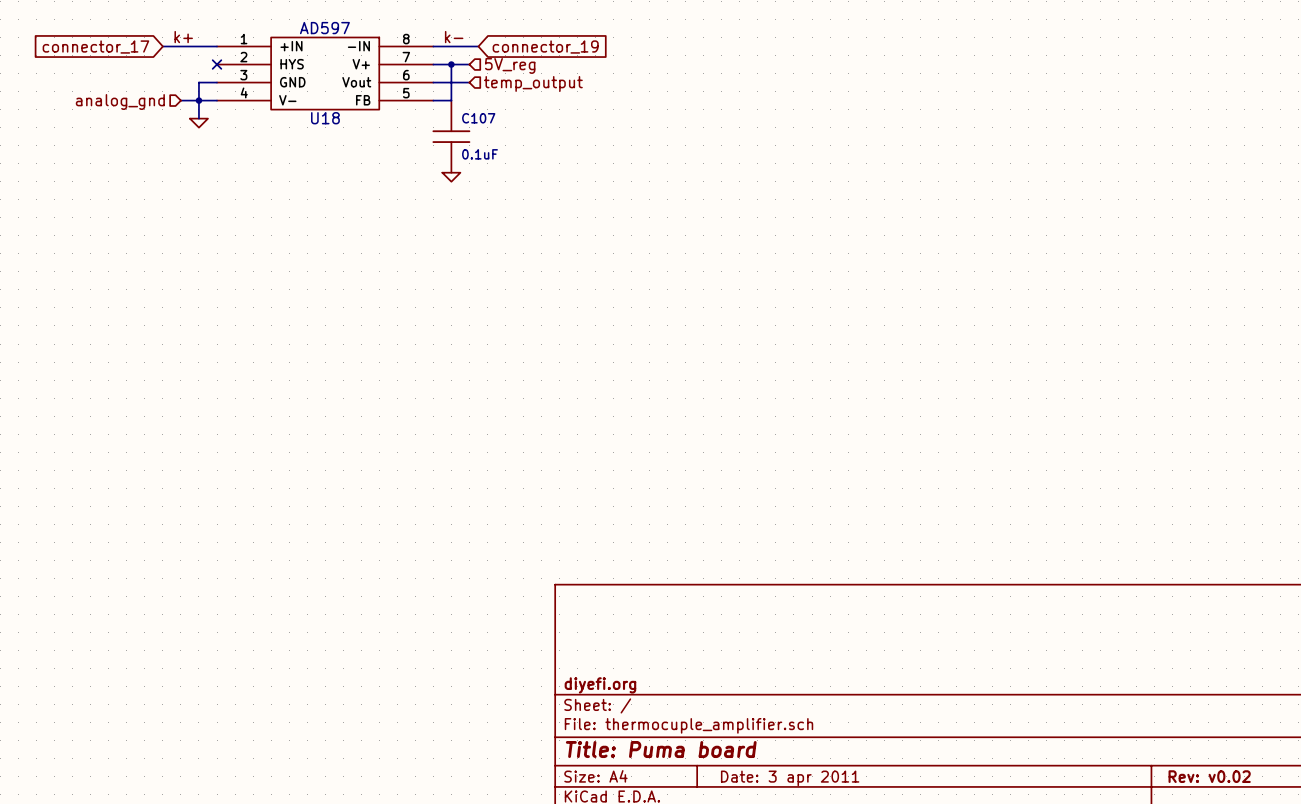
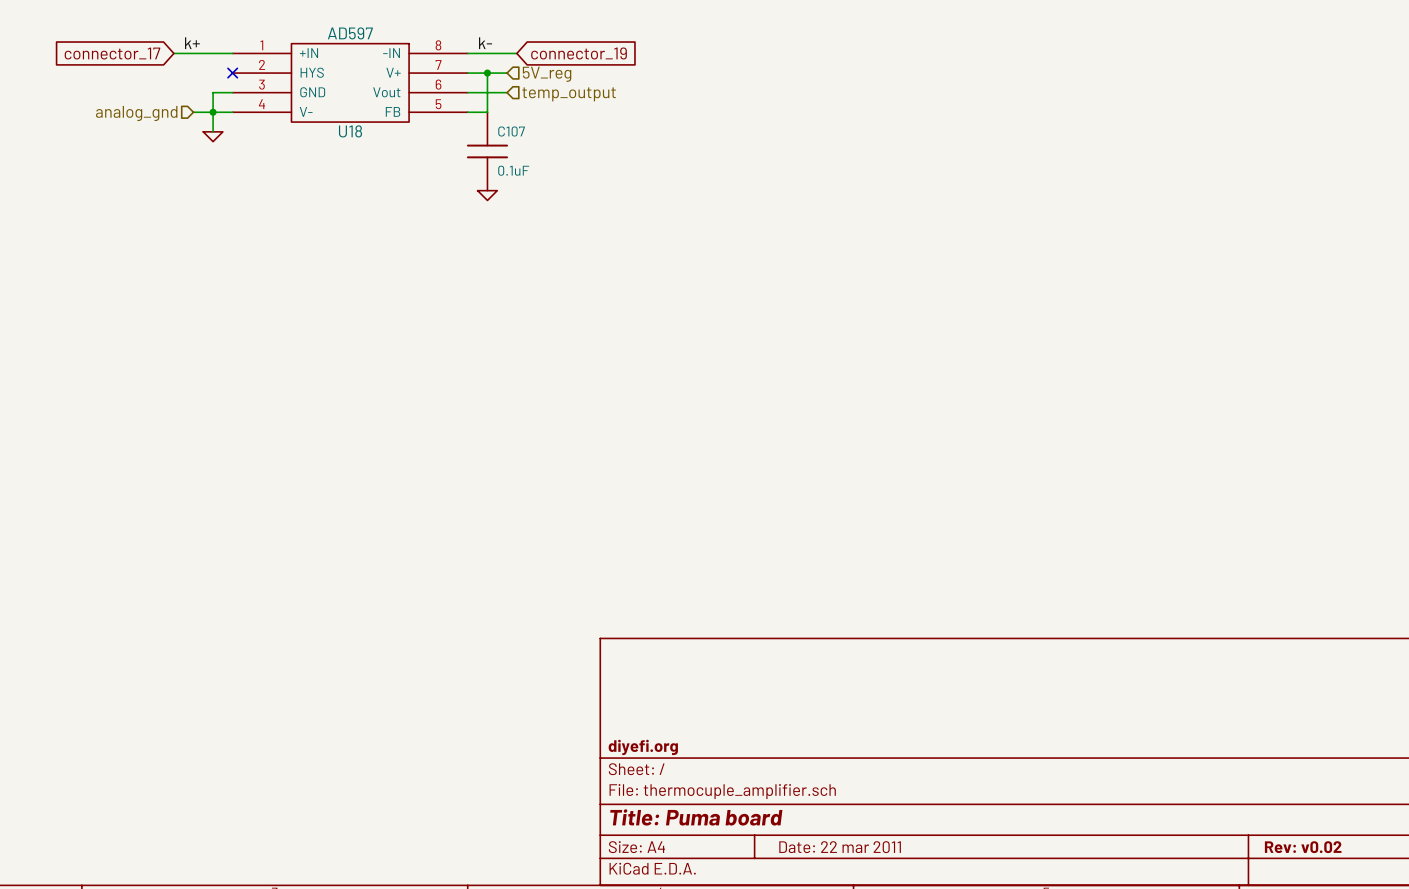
title block: Date: 3 apr 2011 (790, 778) -> Date: 22 mar 2011 (840, 847)

